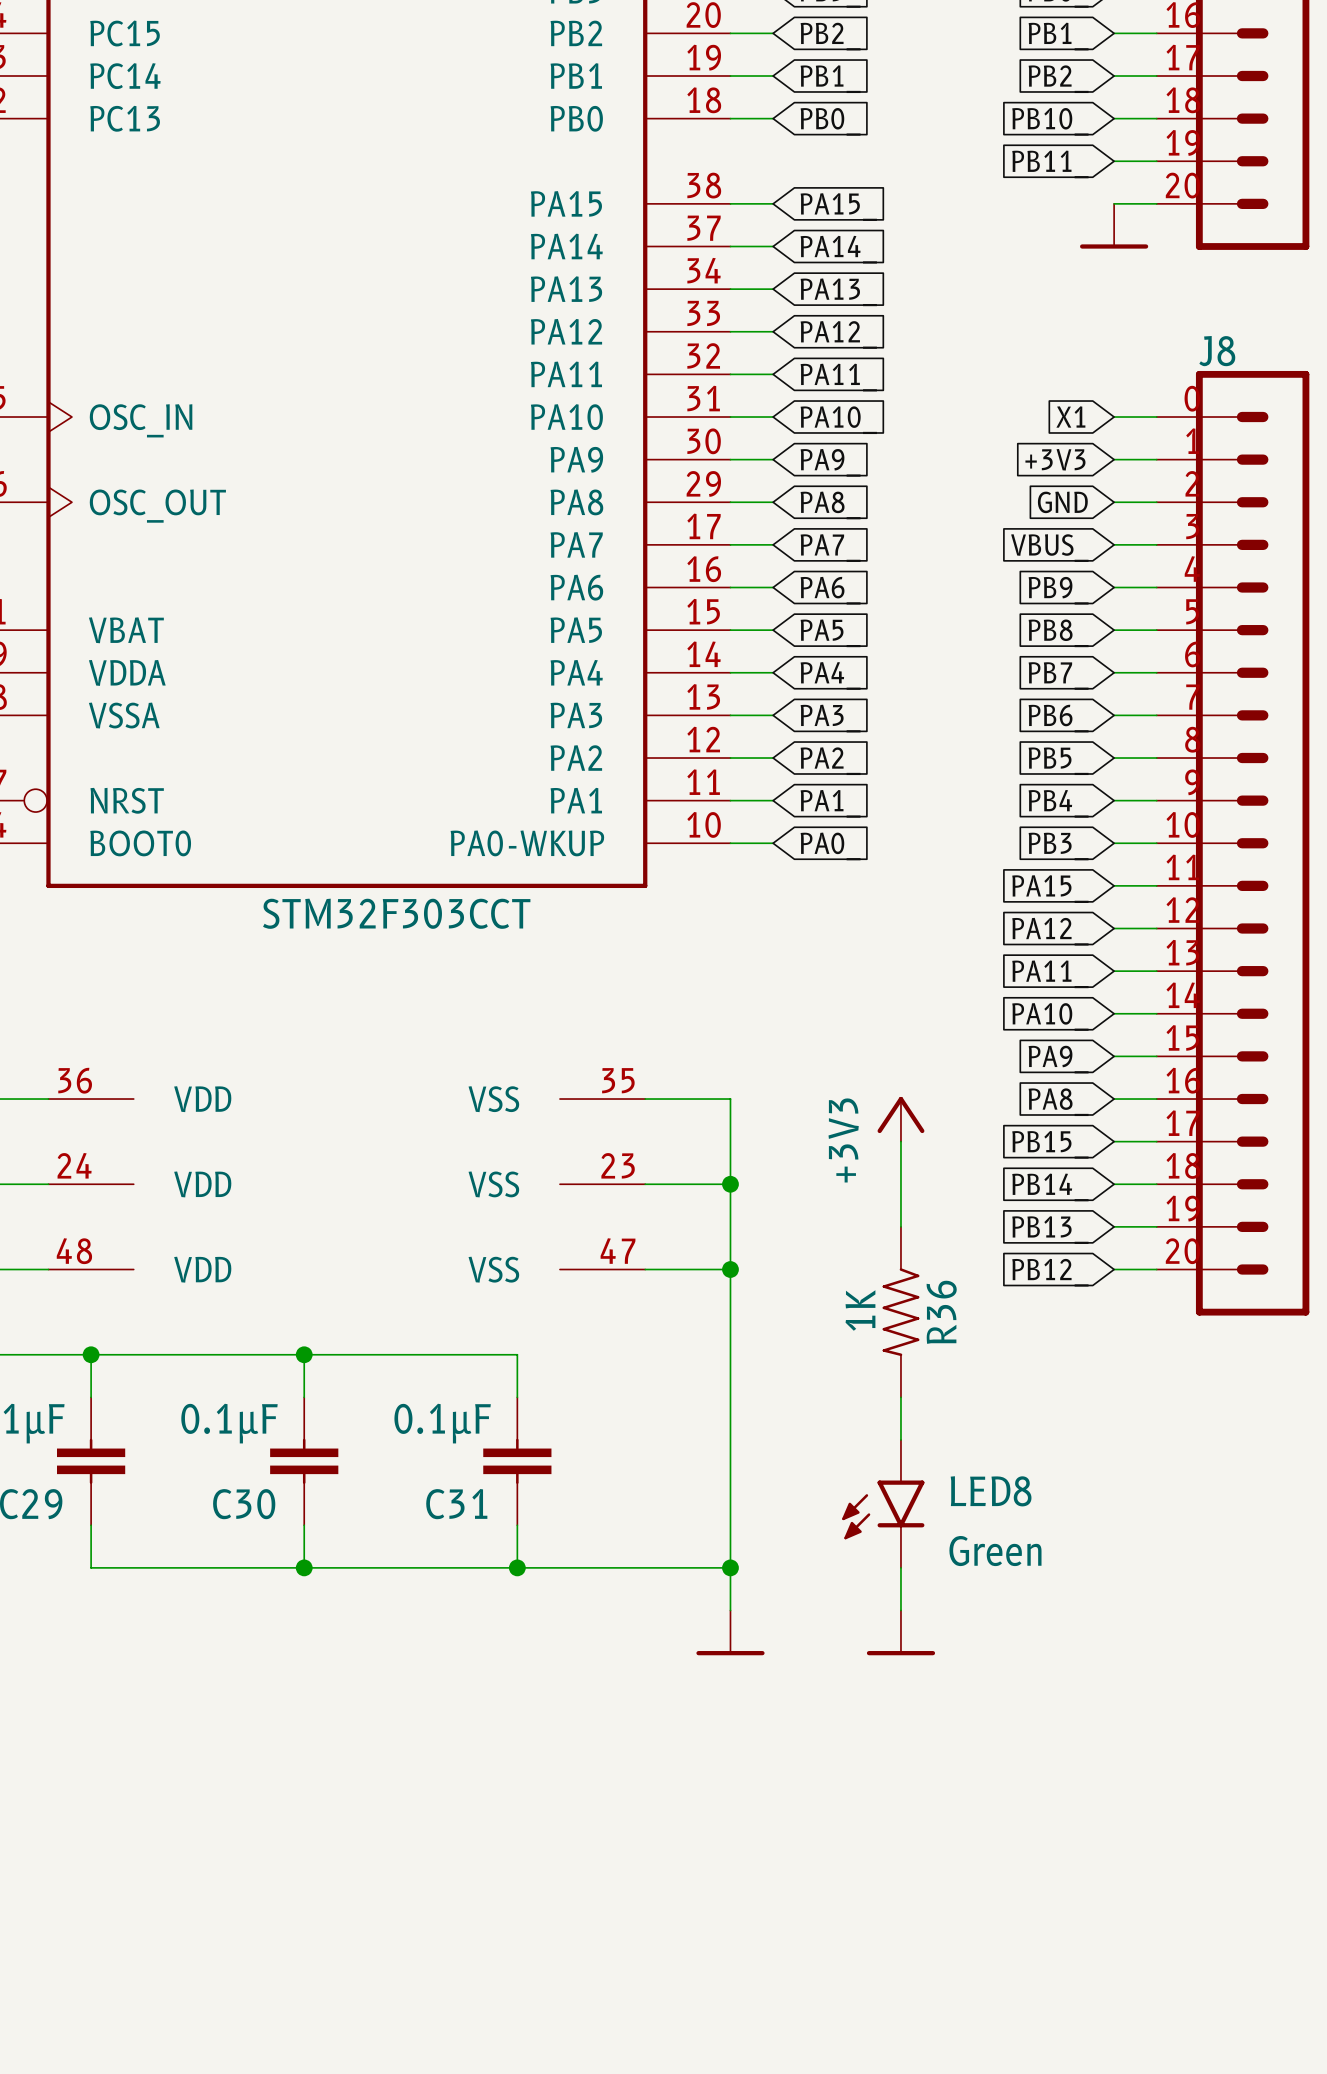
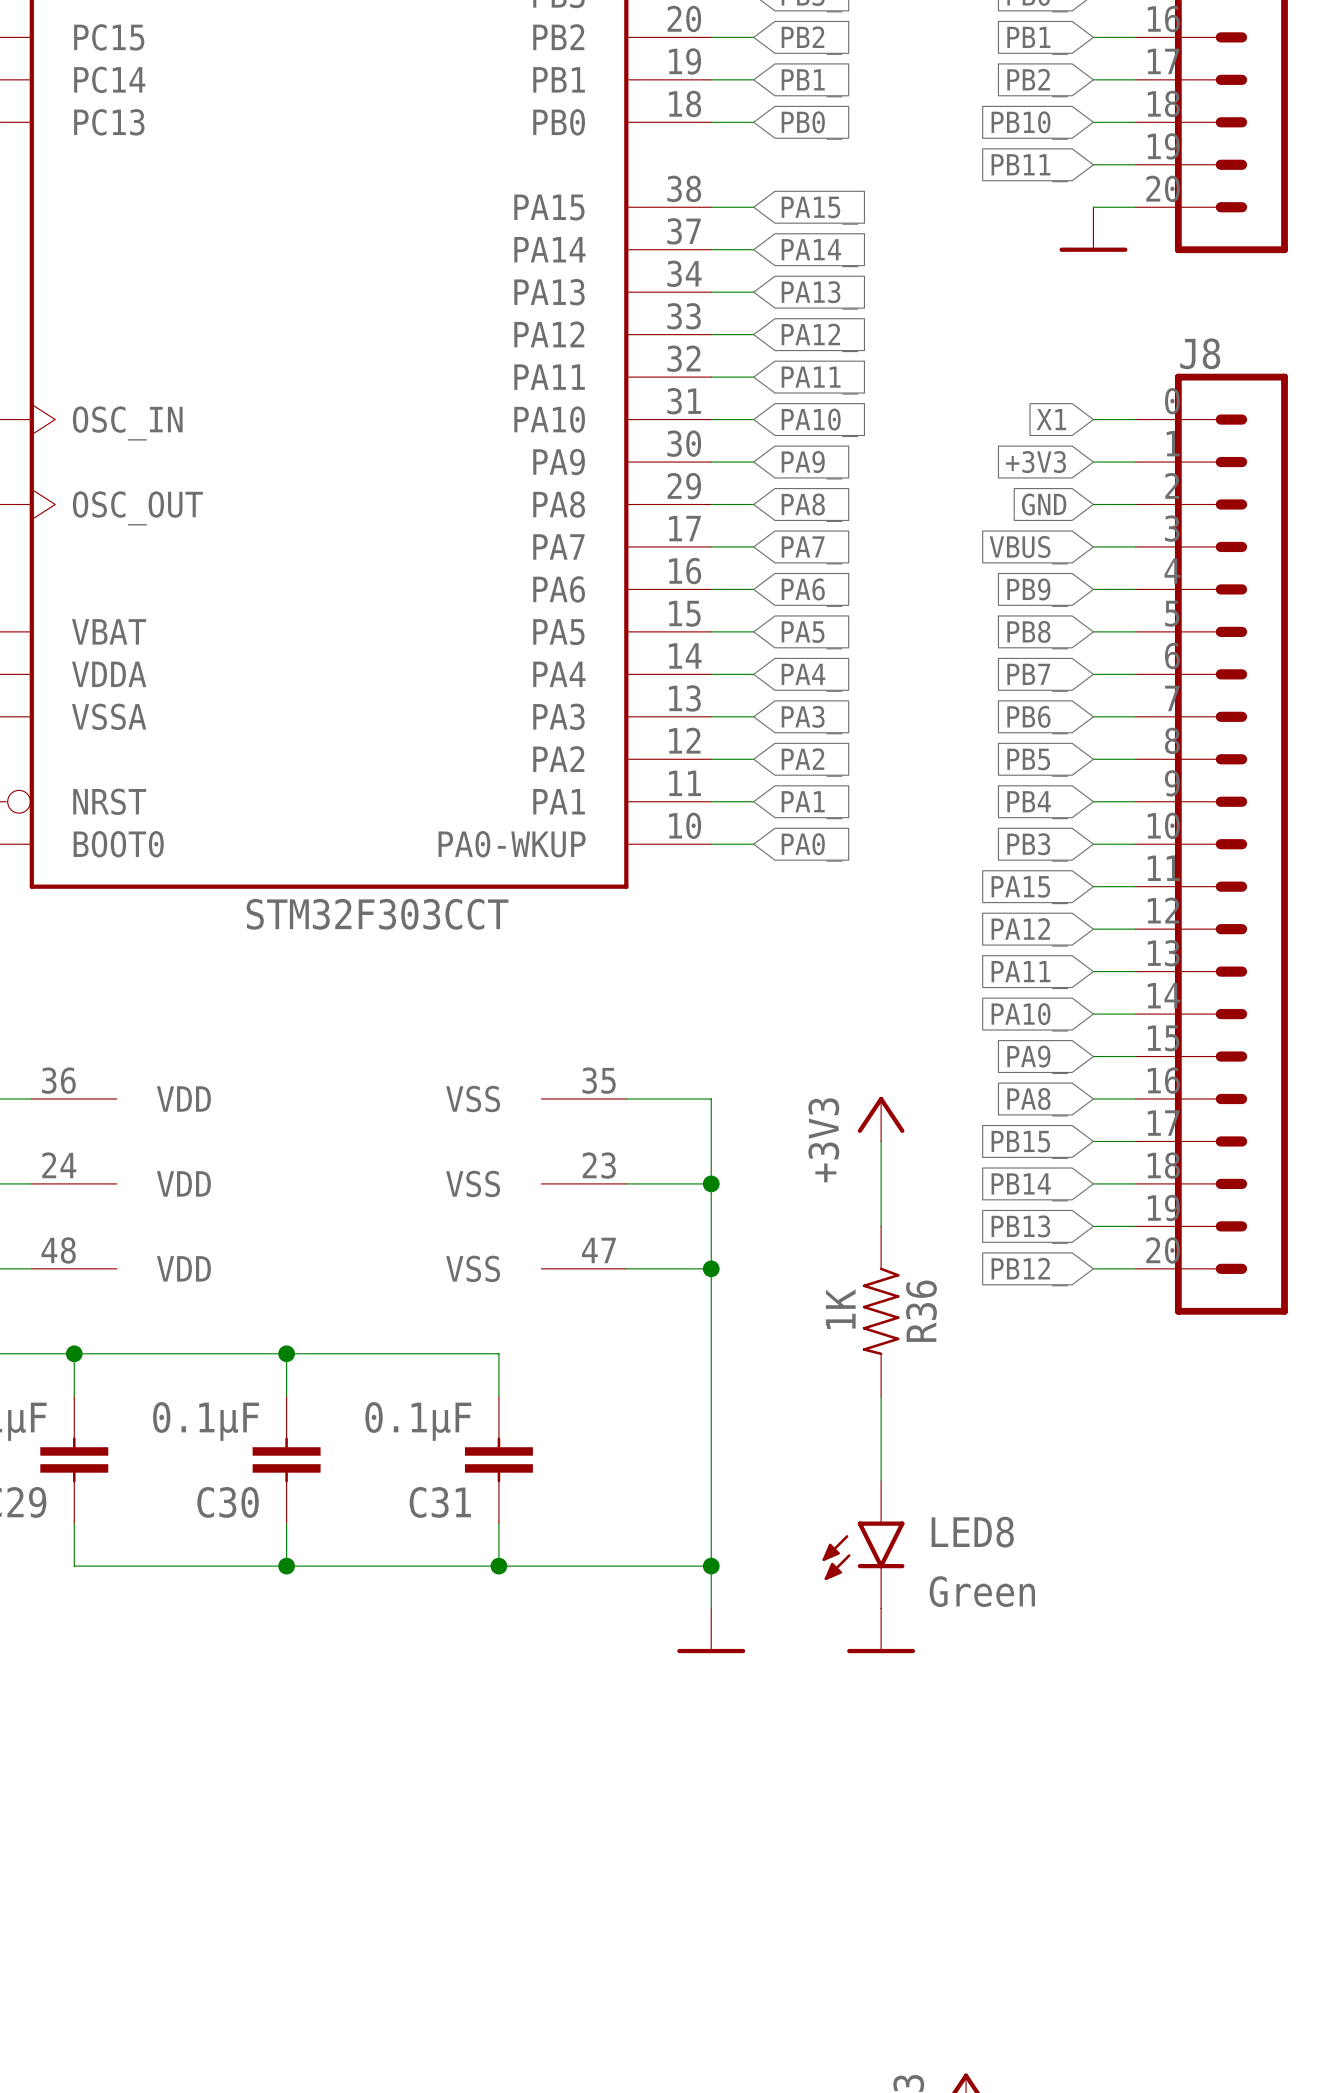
LED8 position: (883, 1503) -> (863, 1544)

